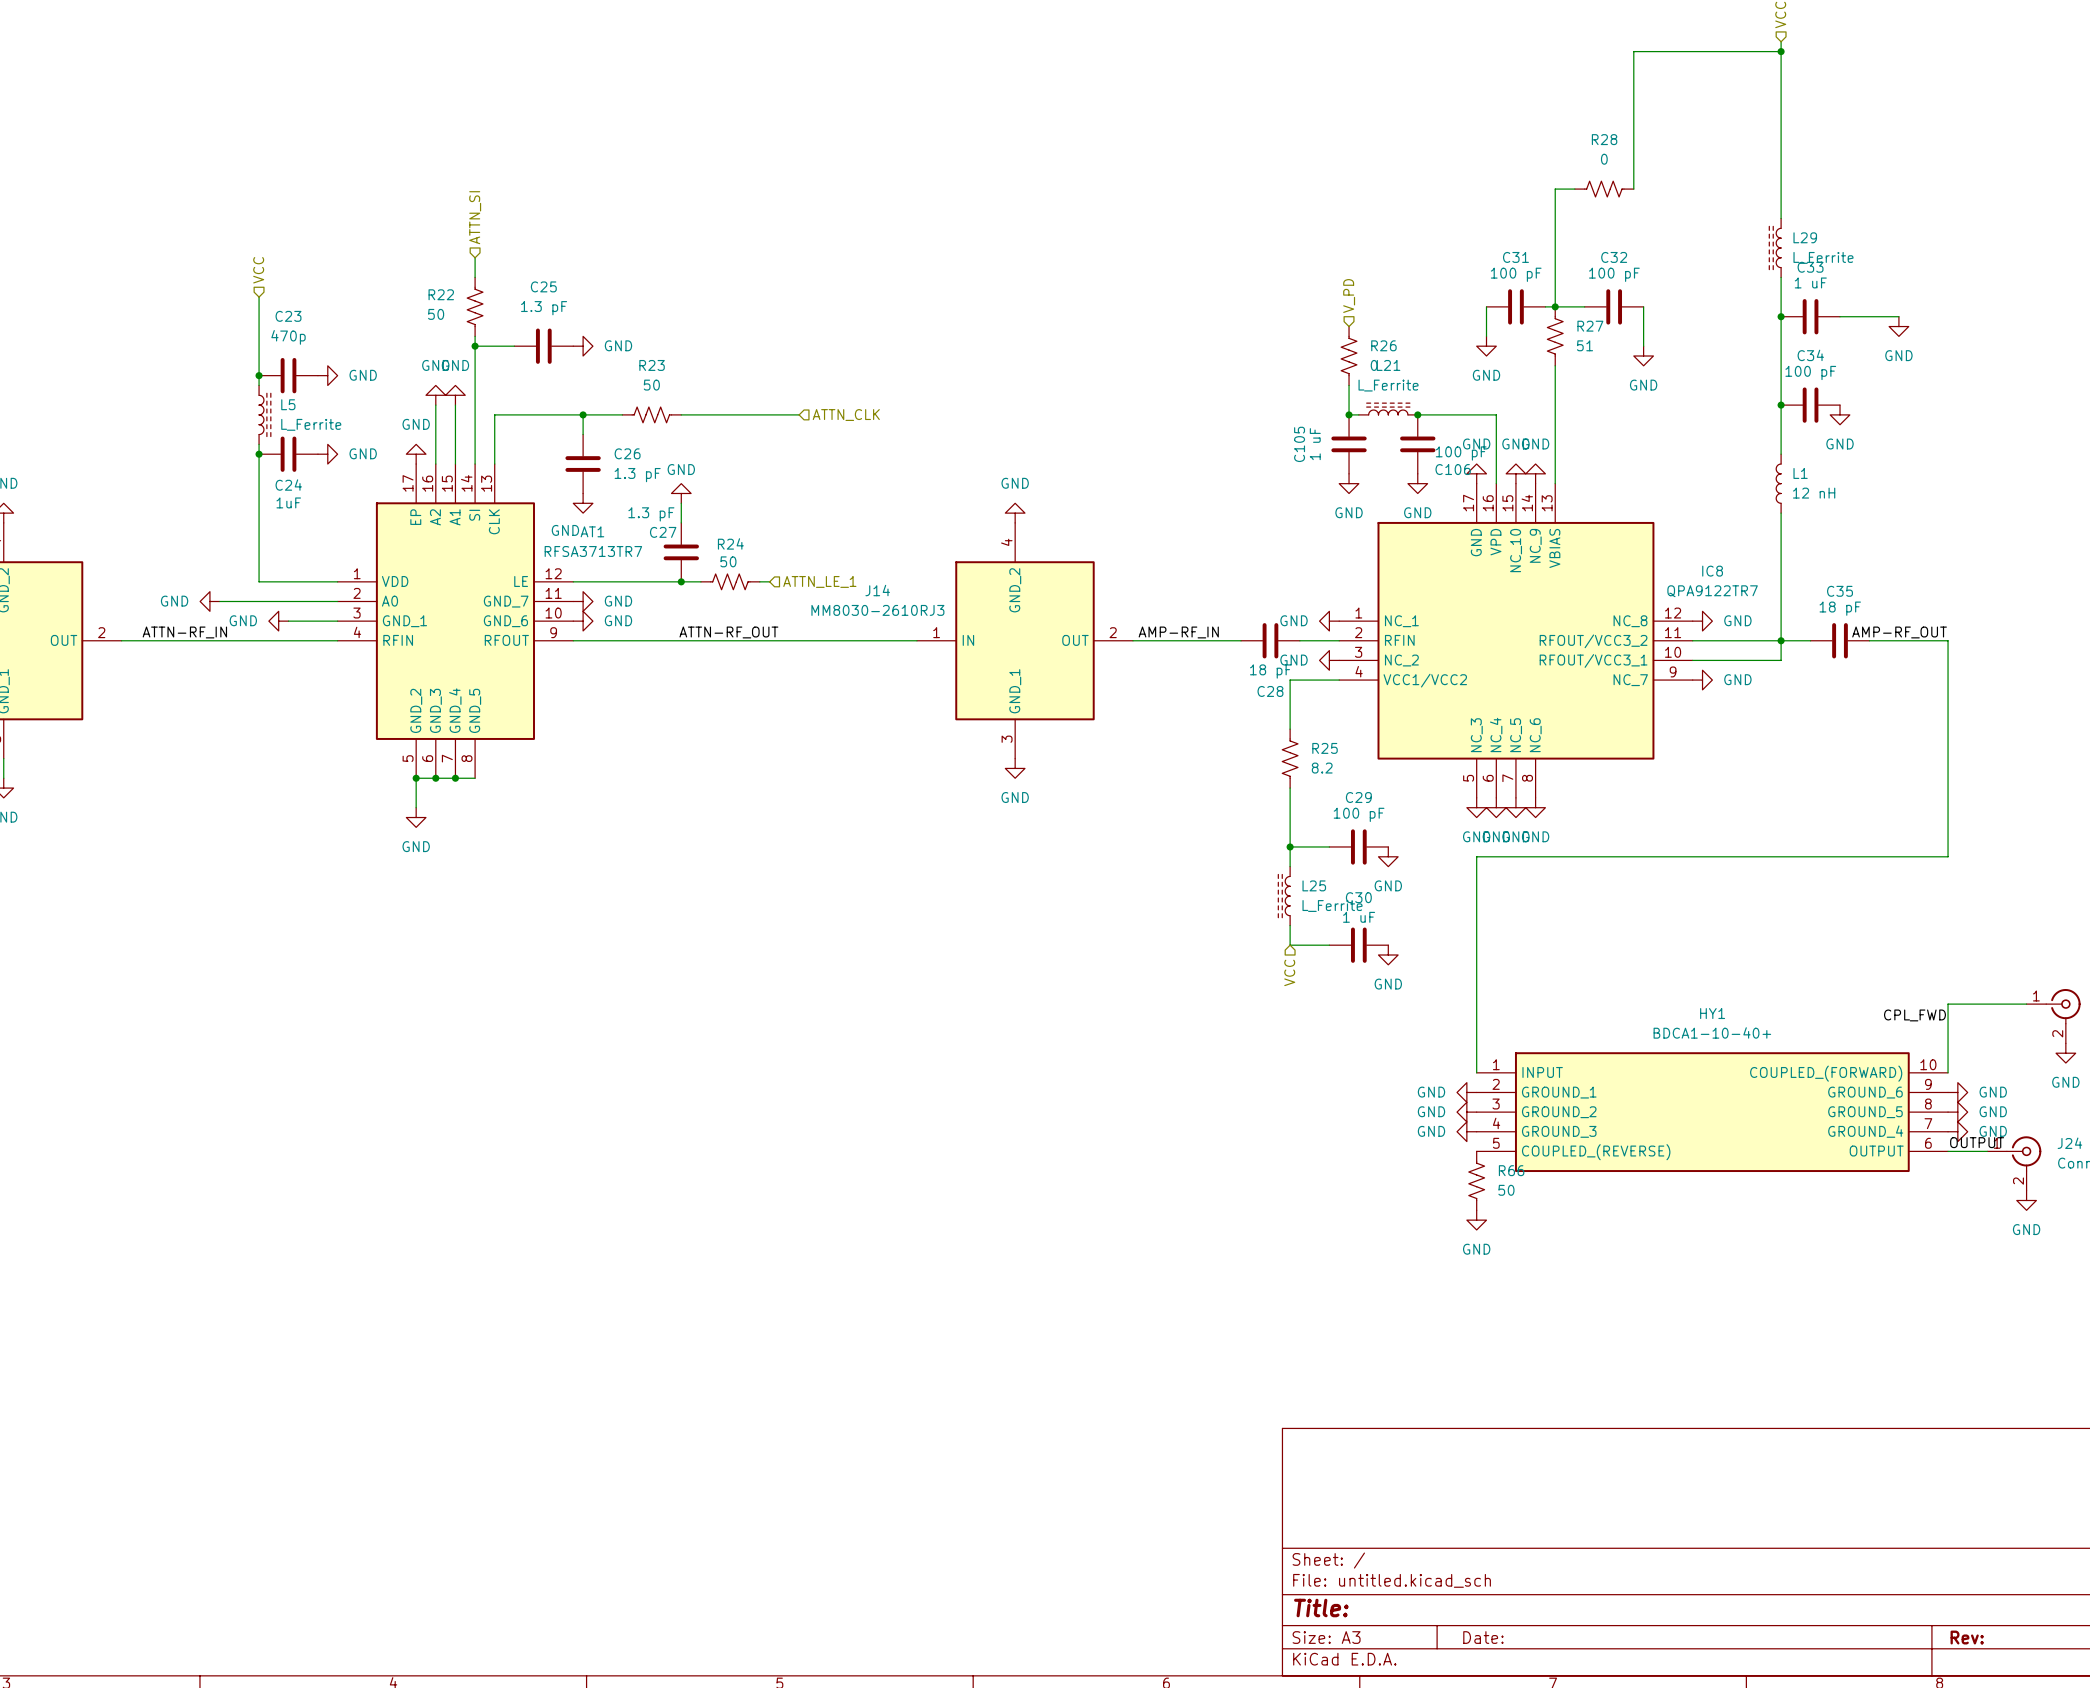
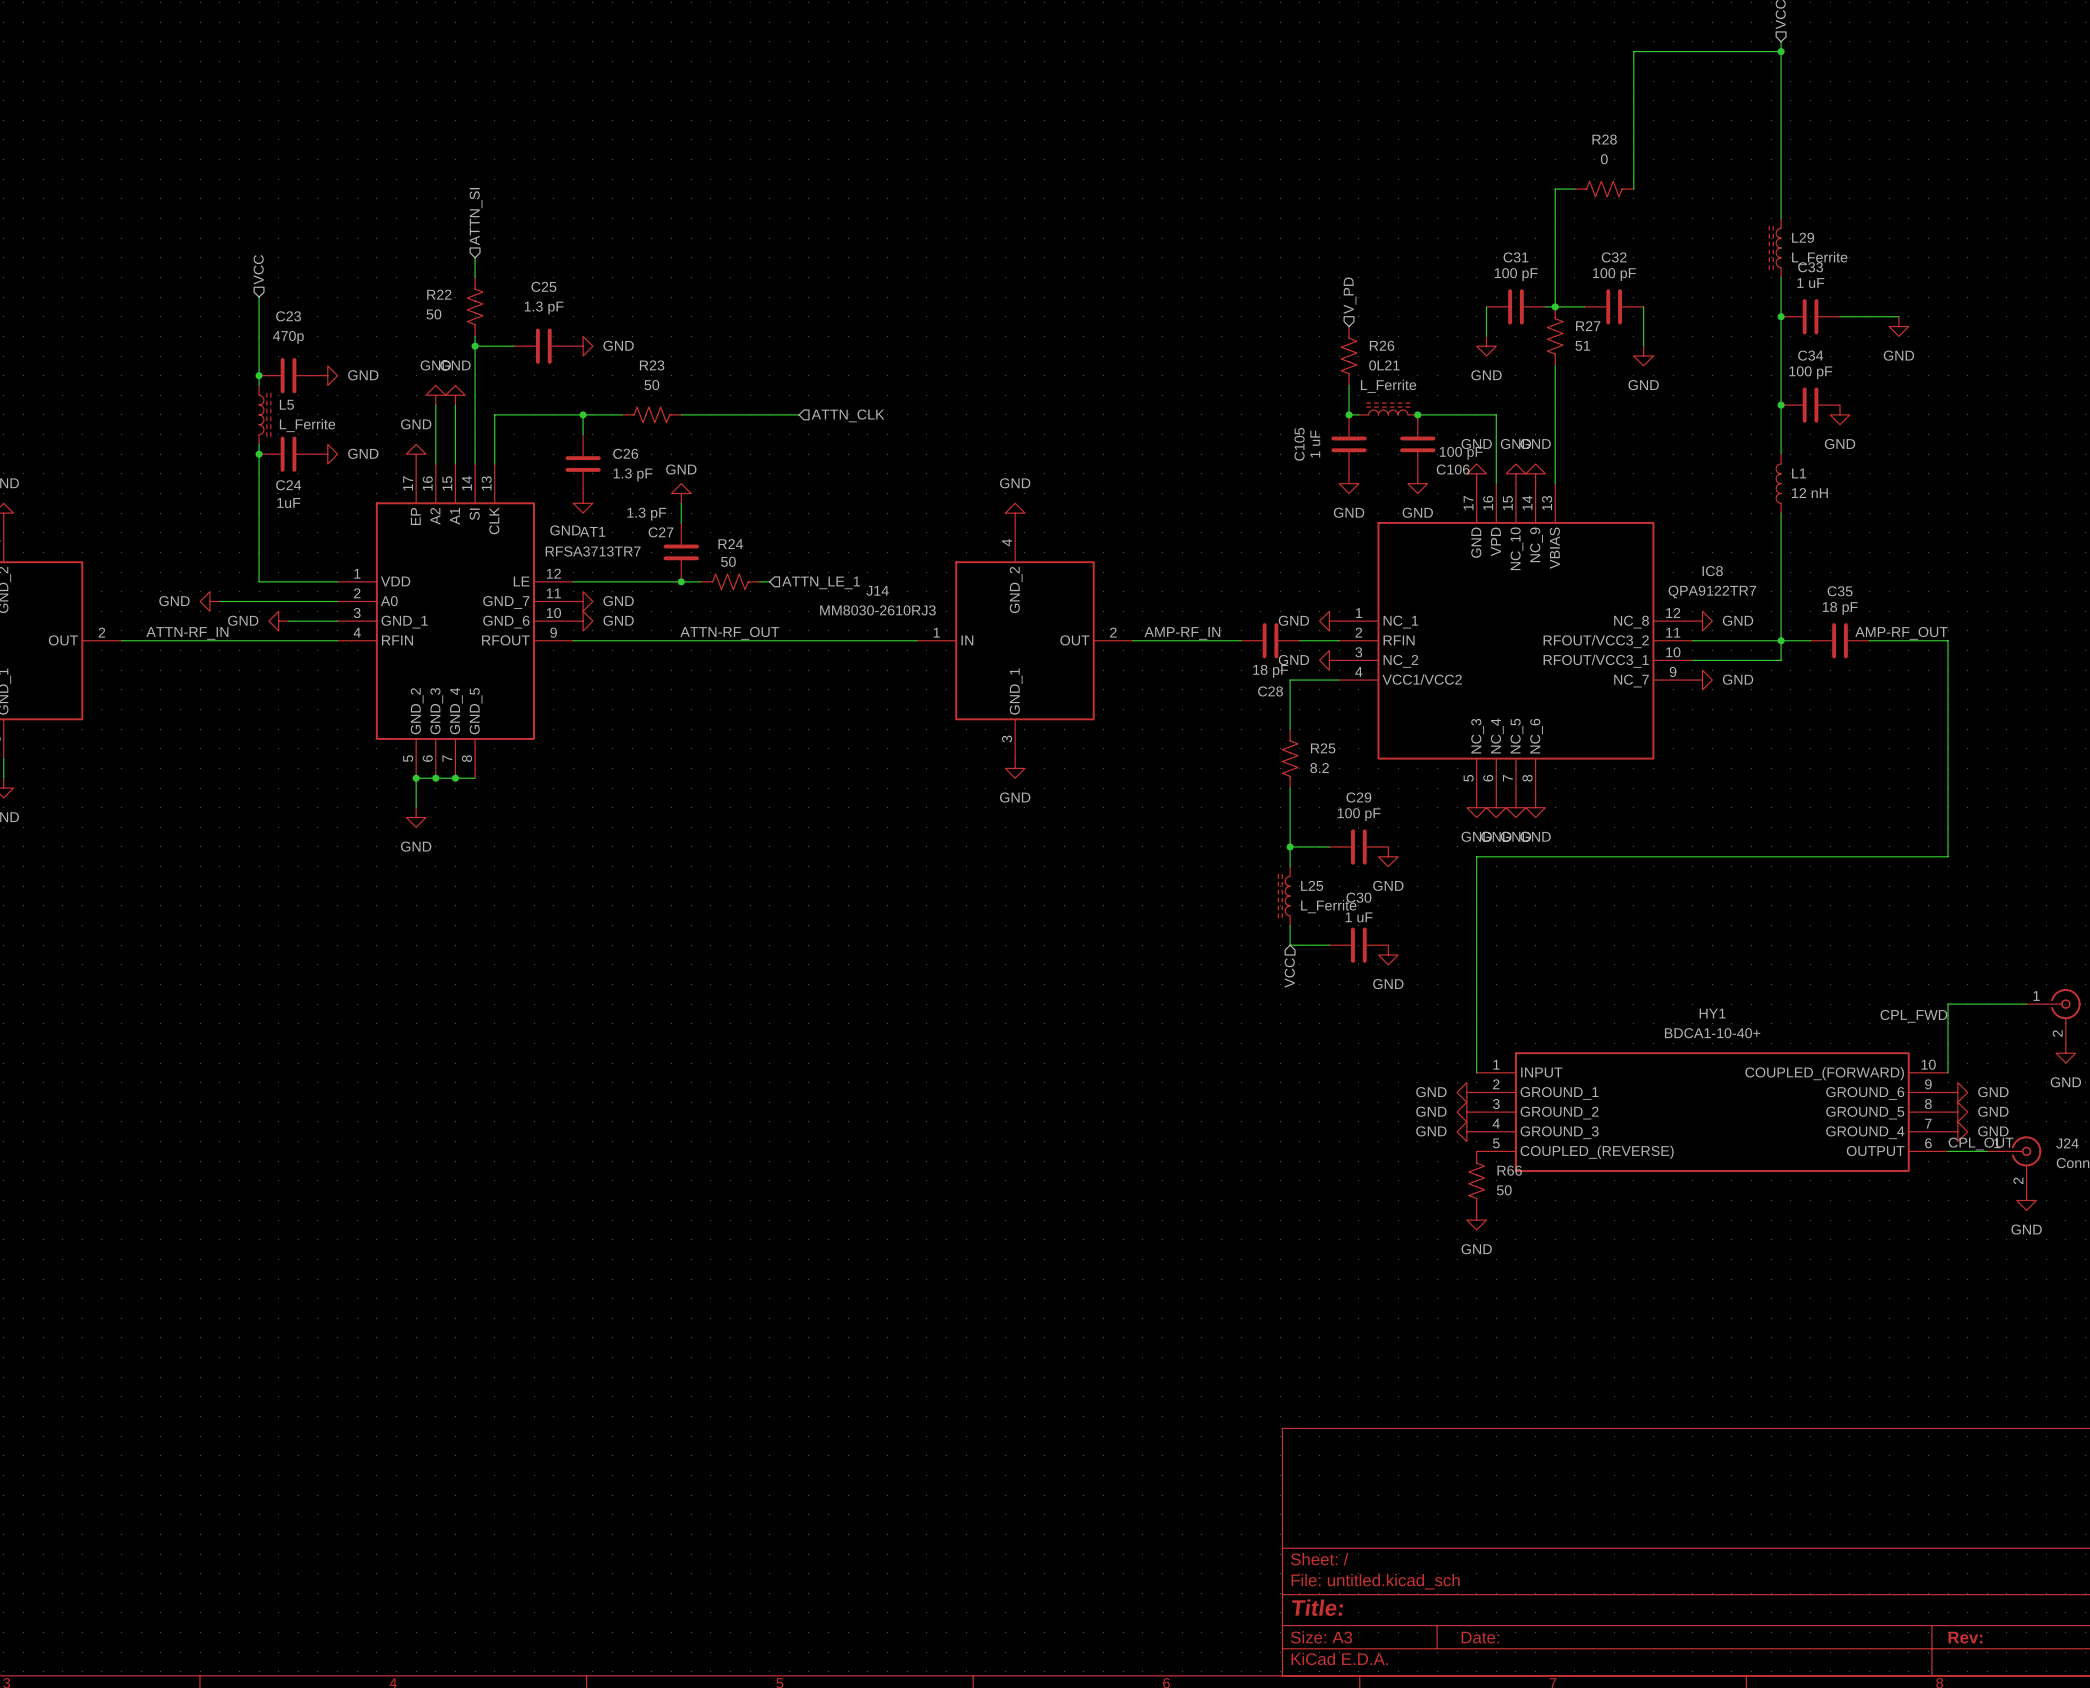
label: OUTPUT (1977, 1142) -> CPL_OUT (1981, 1143)

